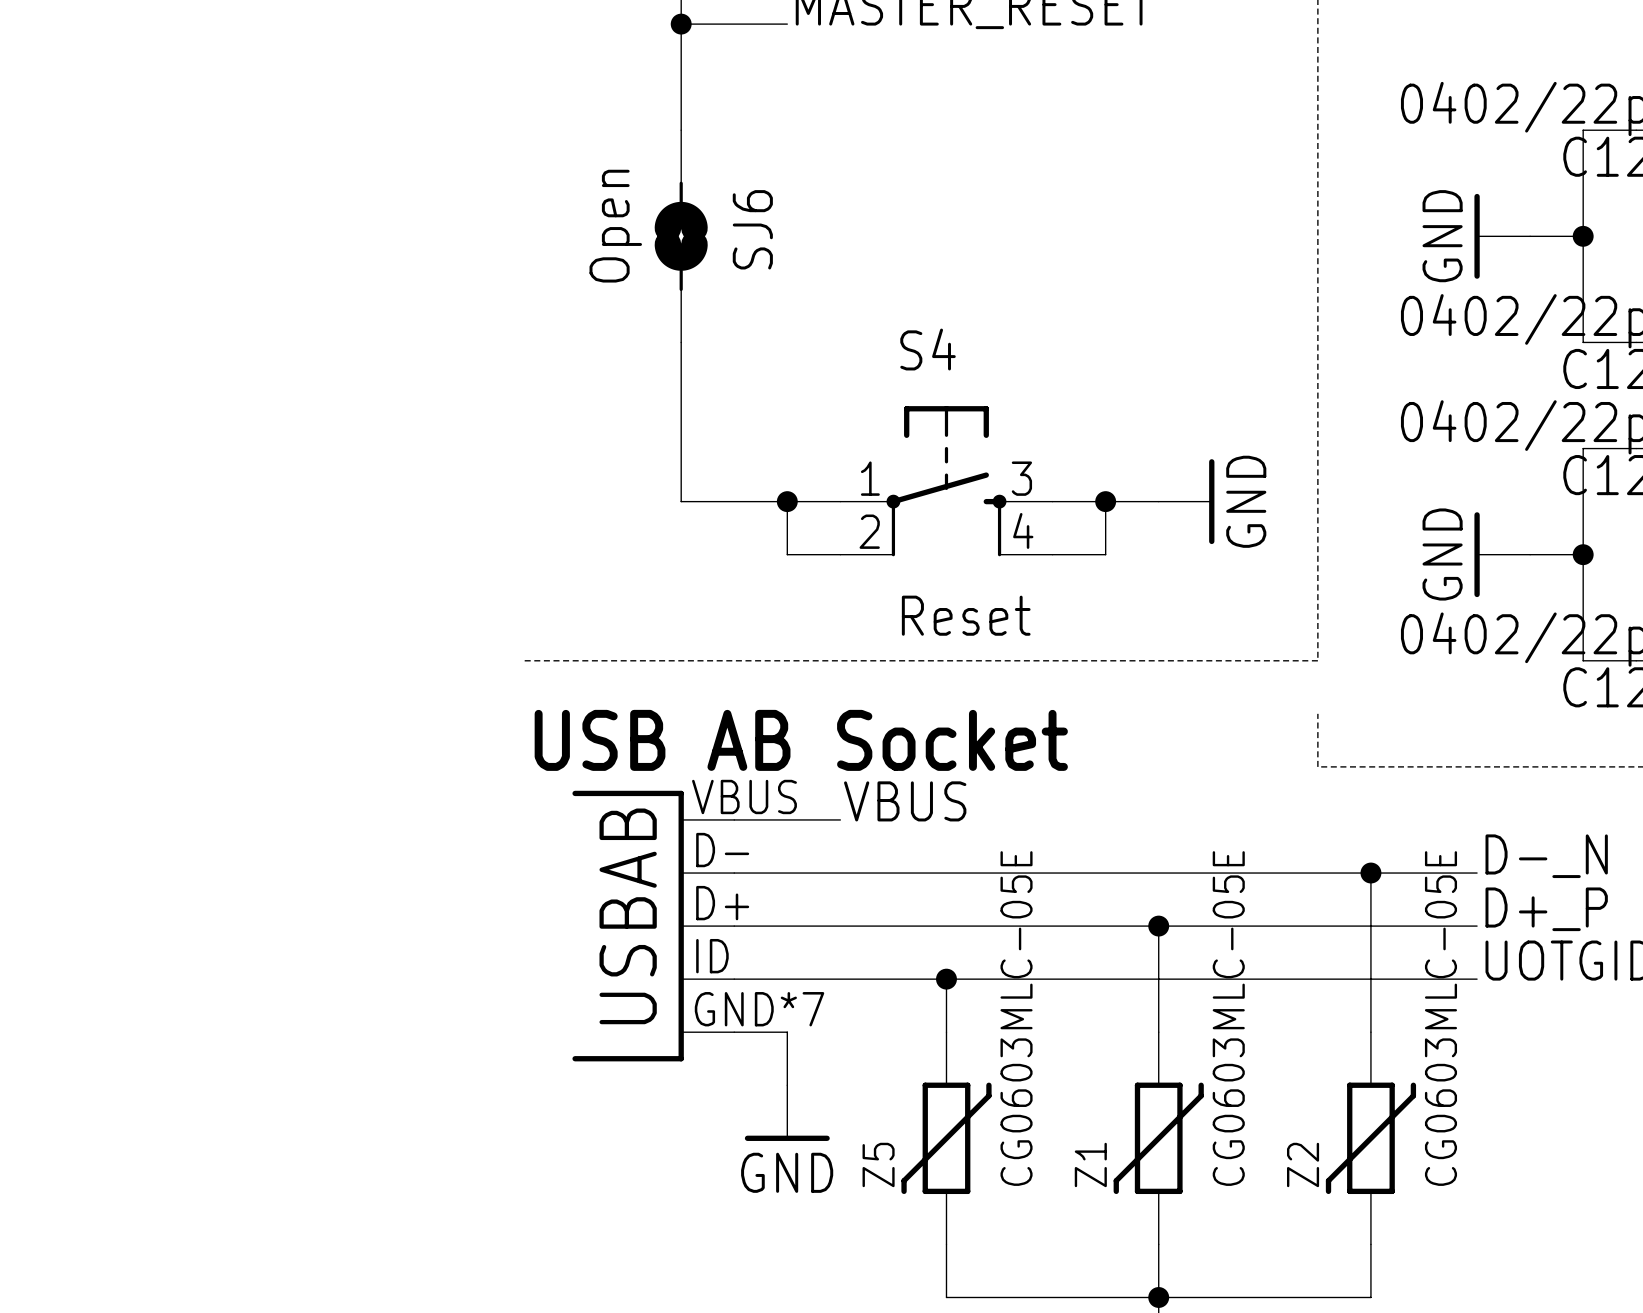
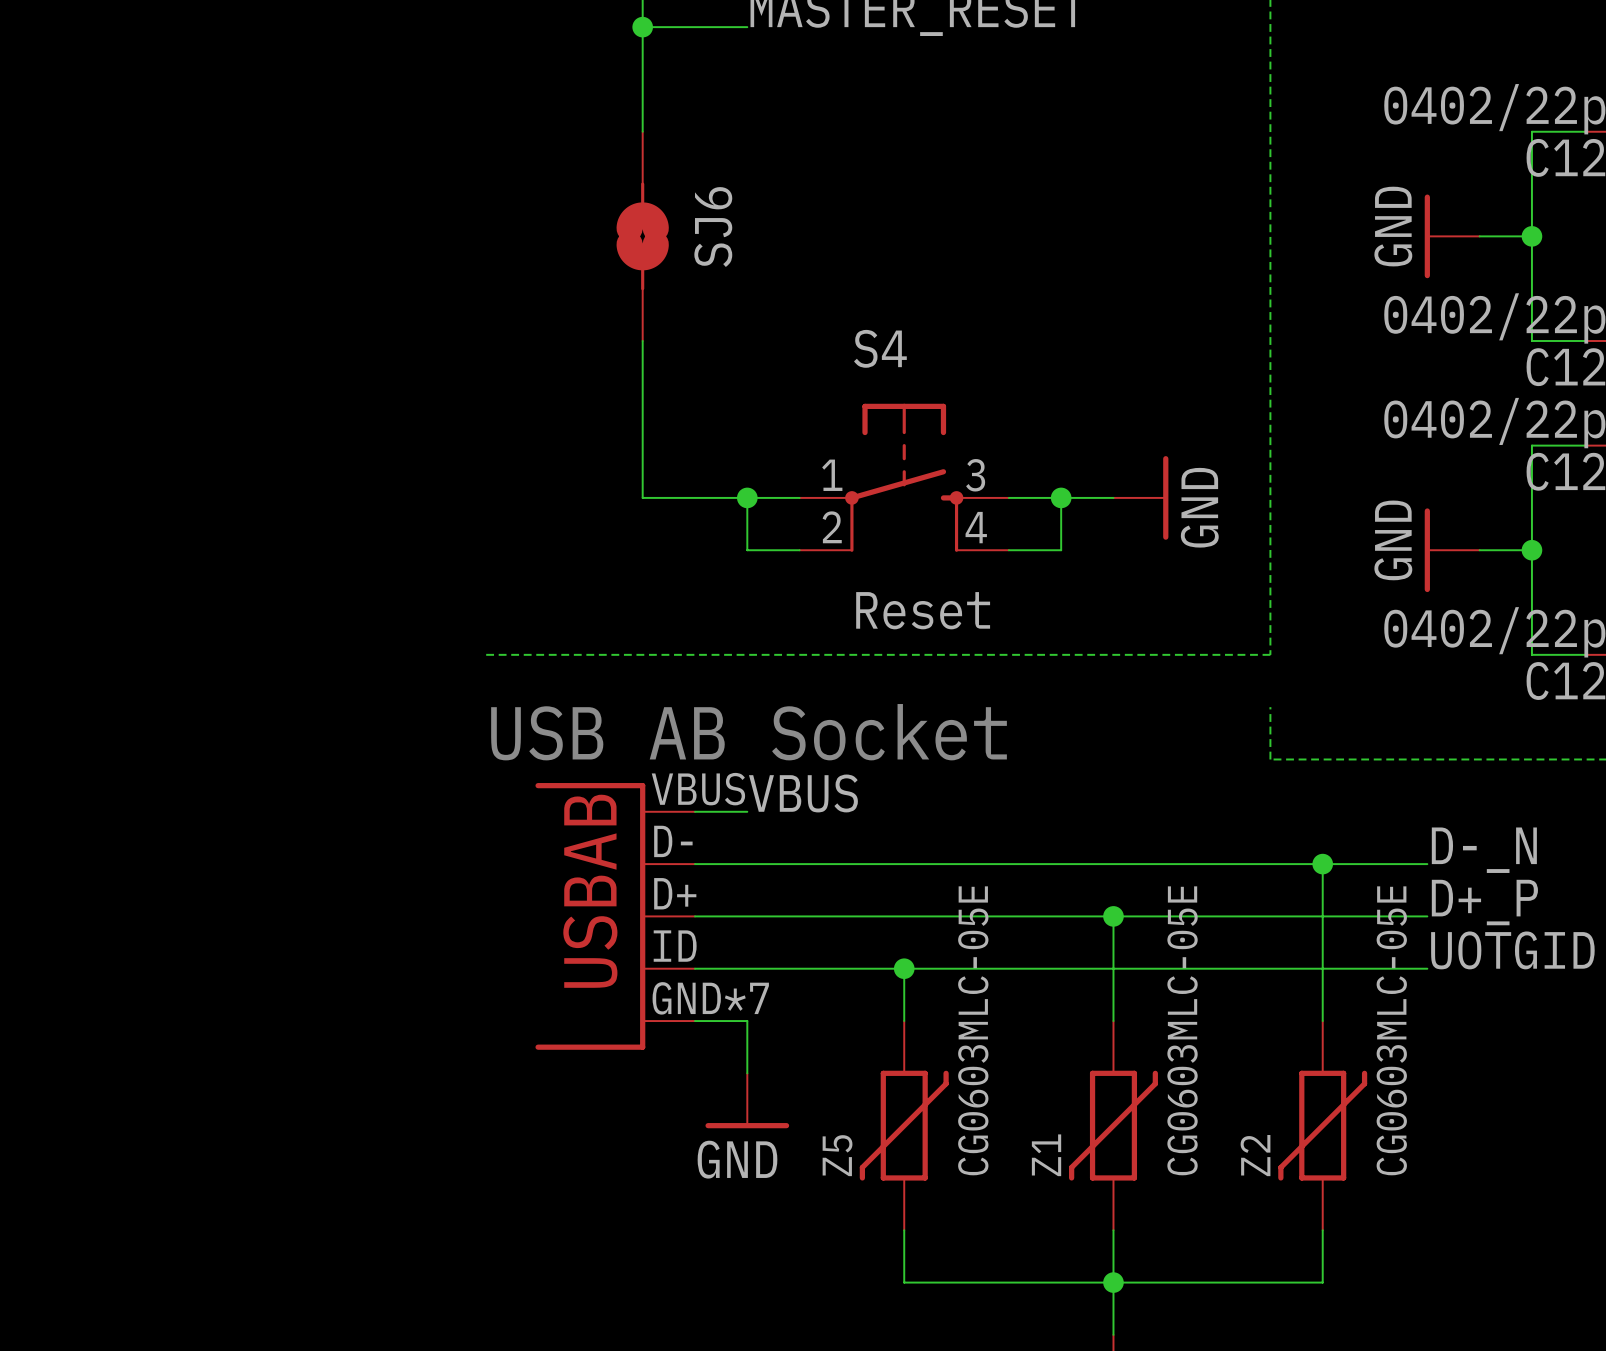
text: Open (615, 226) -> none
label position: VBUS (905, 801) -> VBUS (803, 793)
wire: (787, 819) (840, 819) -> none

